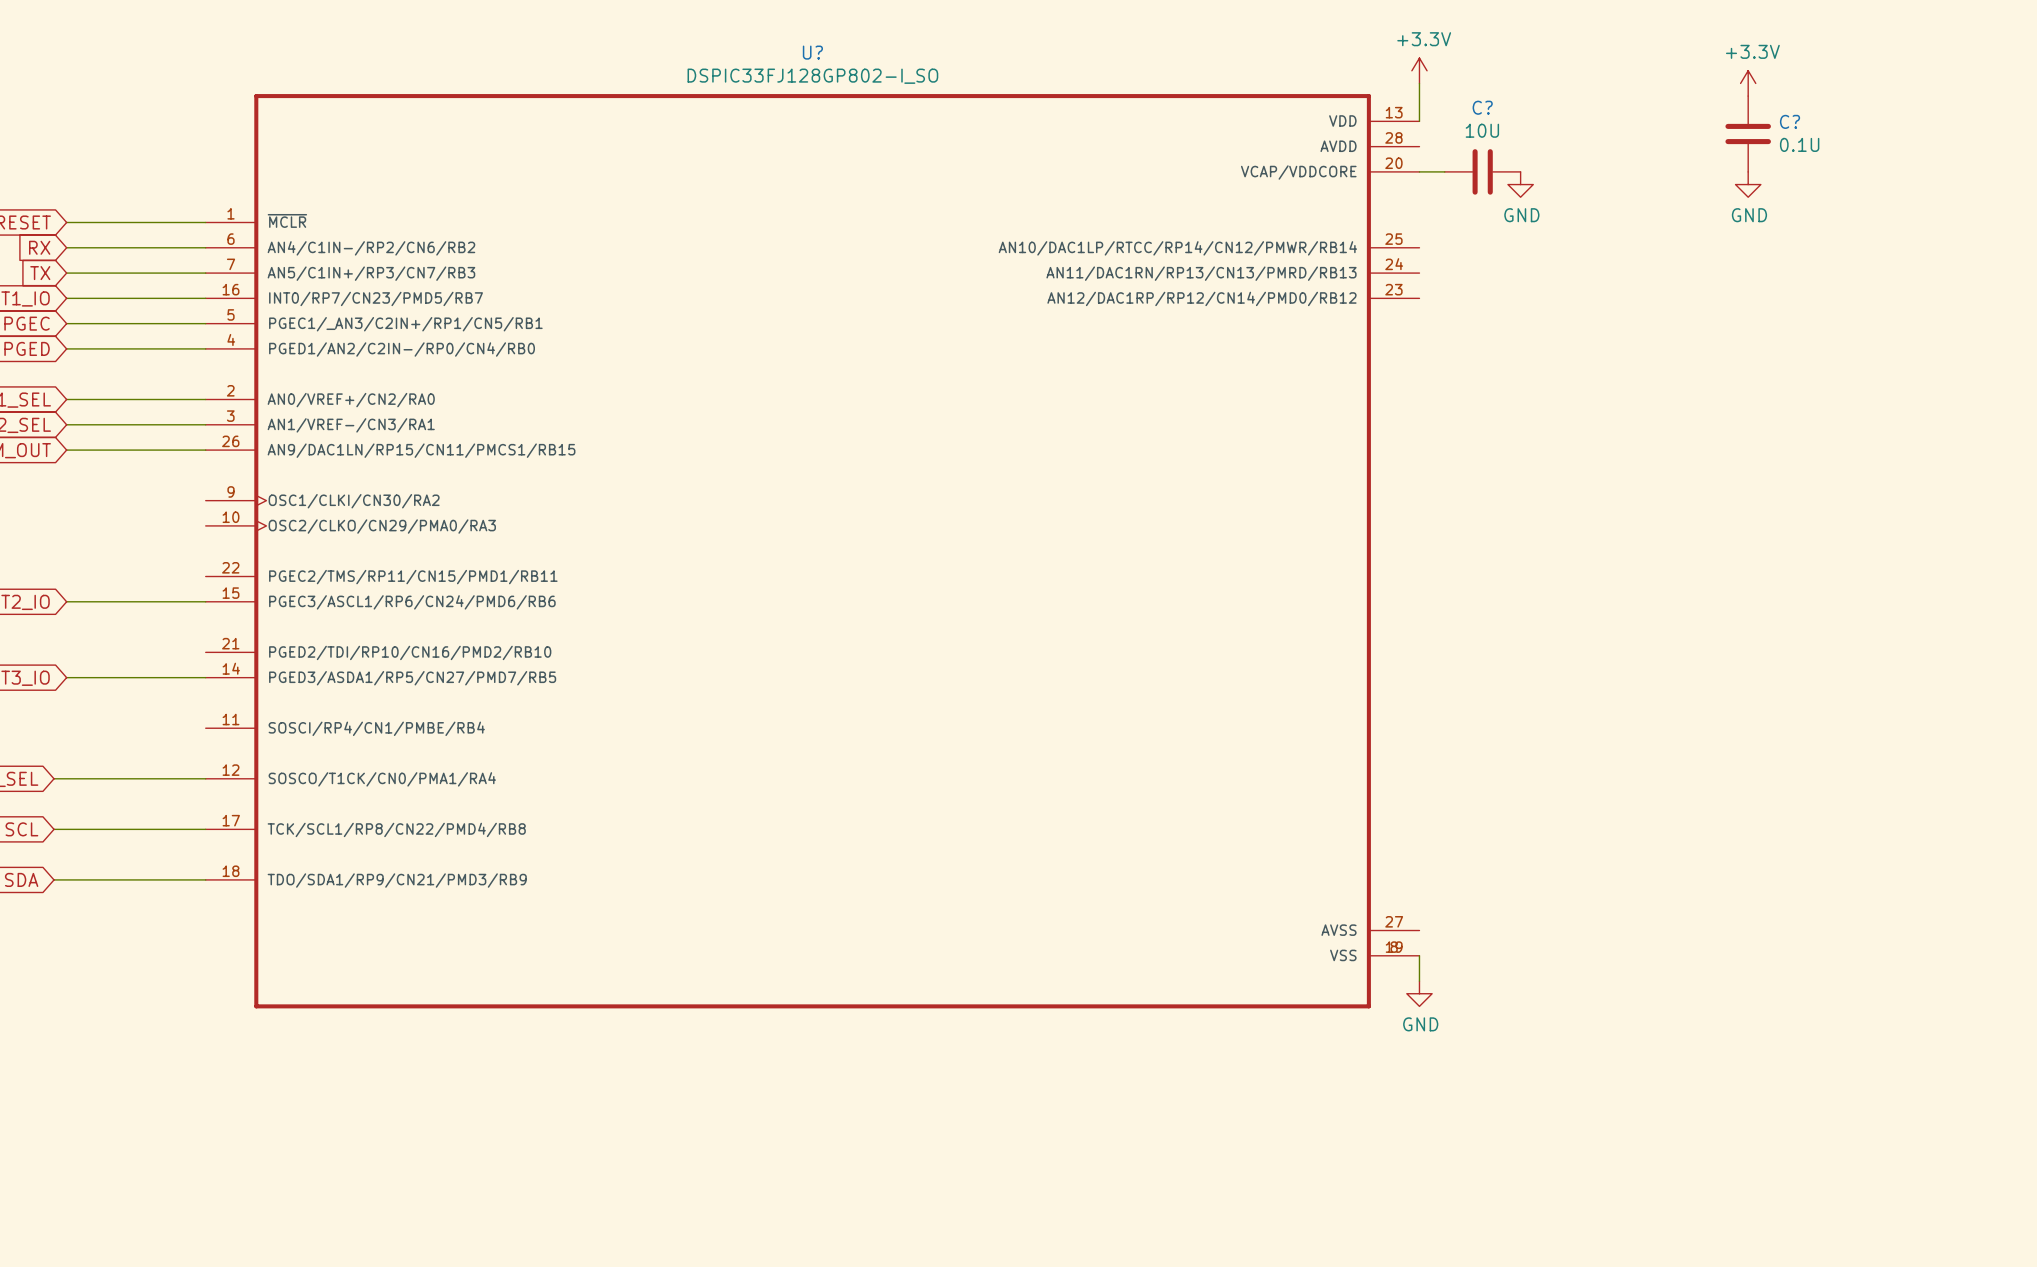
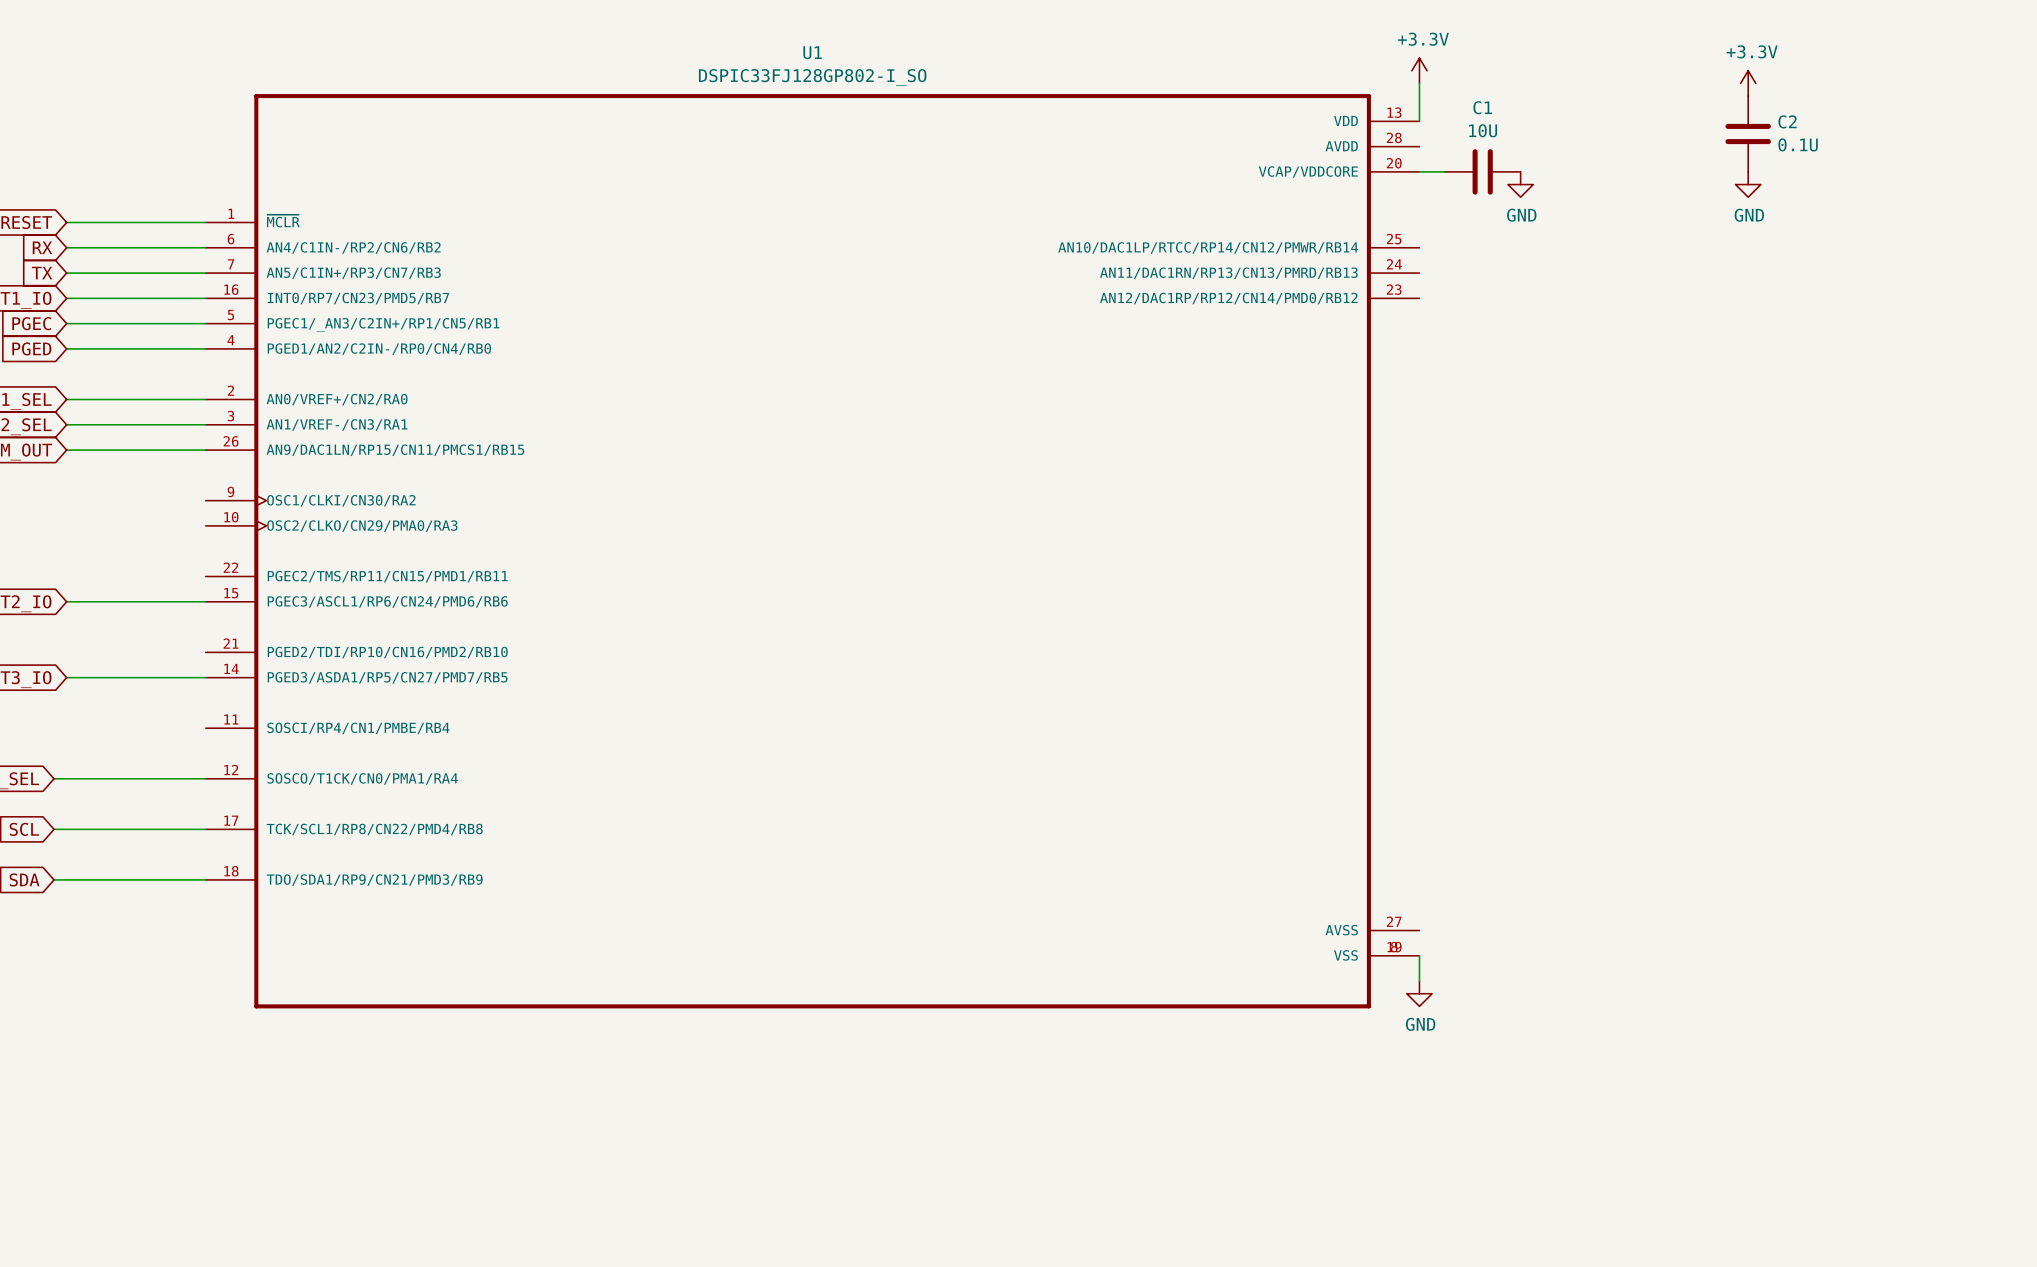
U? name: U? (812, 52) -> U1 (812, 52)
C? name: C? (1482, 107) -> C1 (1482, 107)
C? name: C? (1790, 121) -> C2 (1787, 121)

